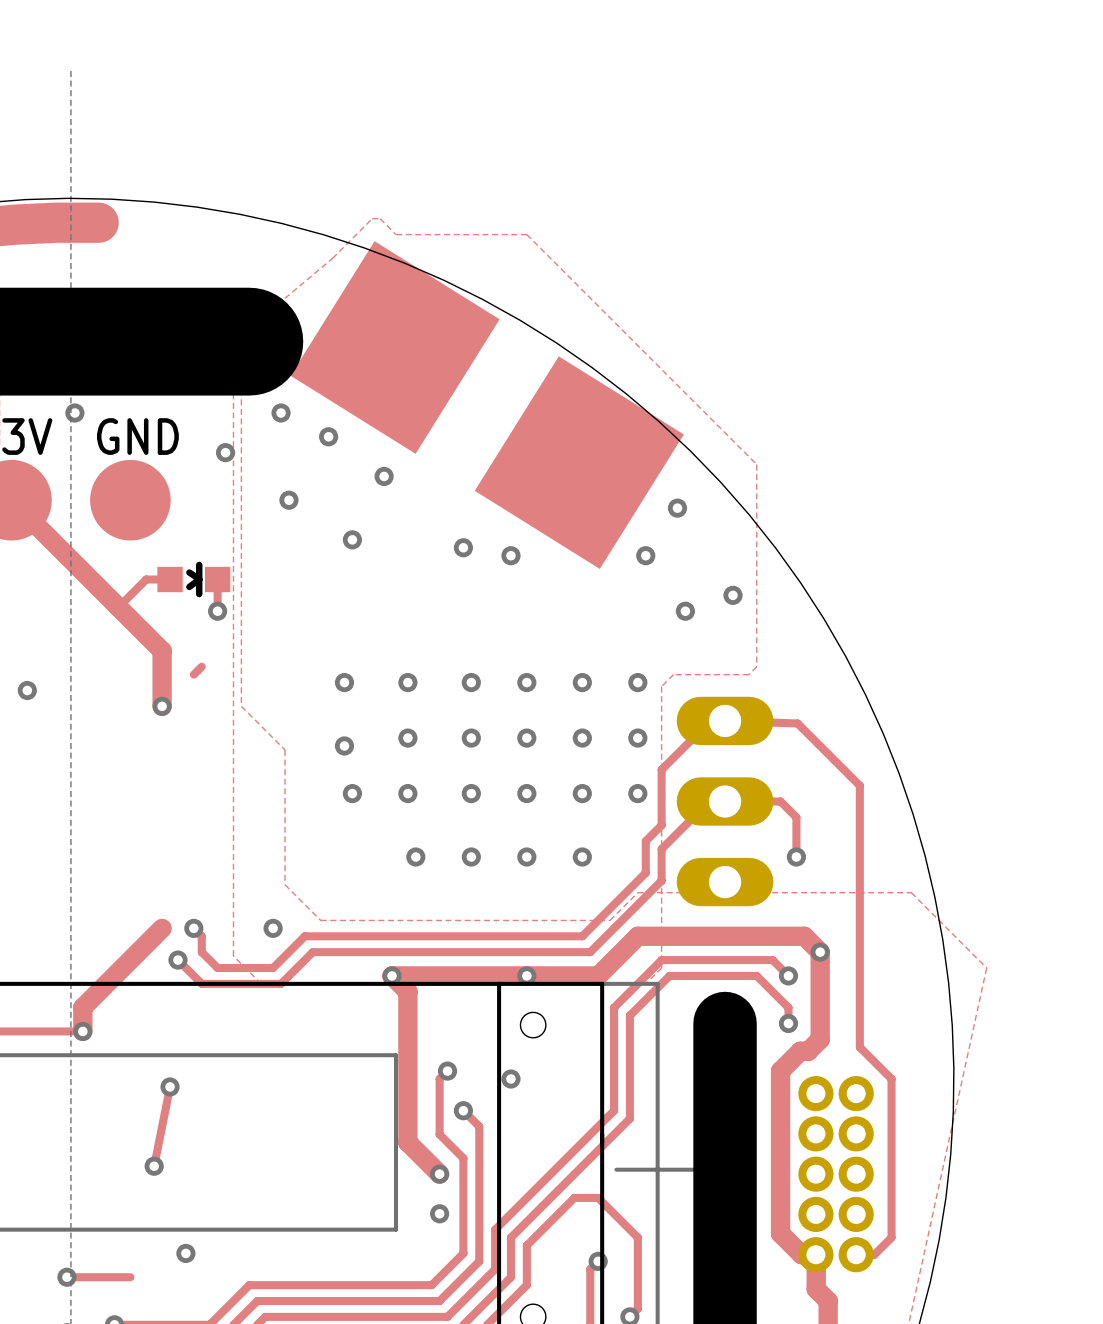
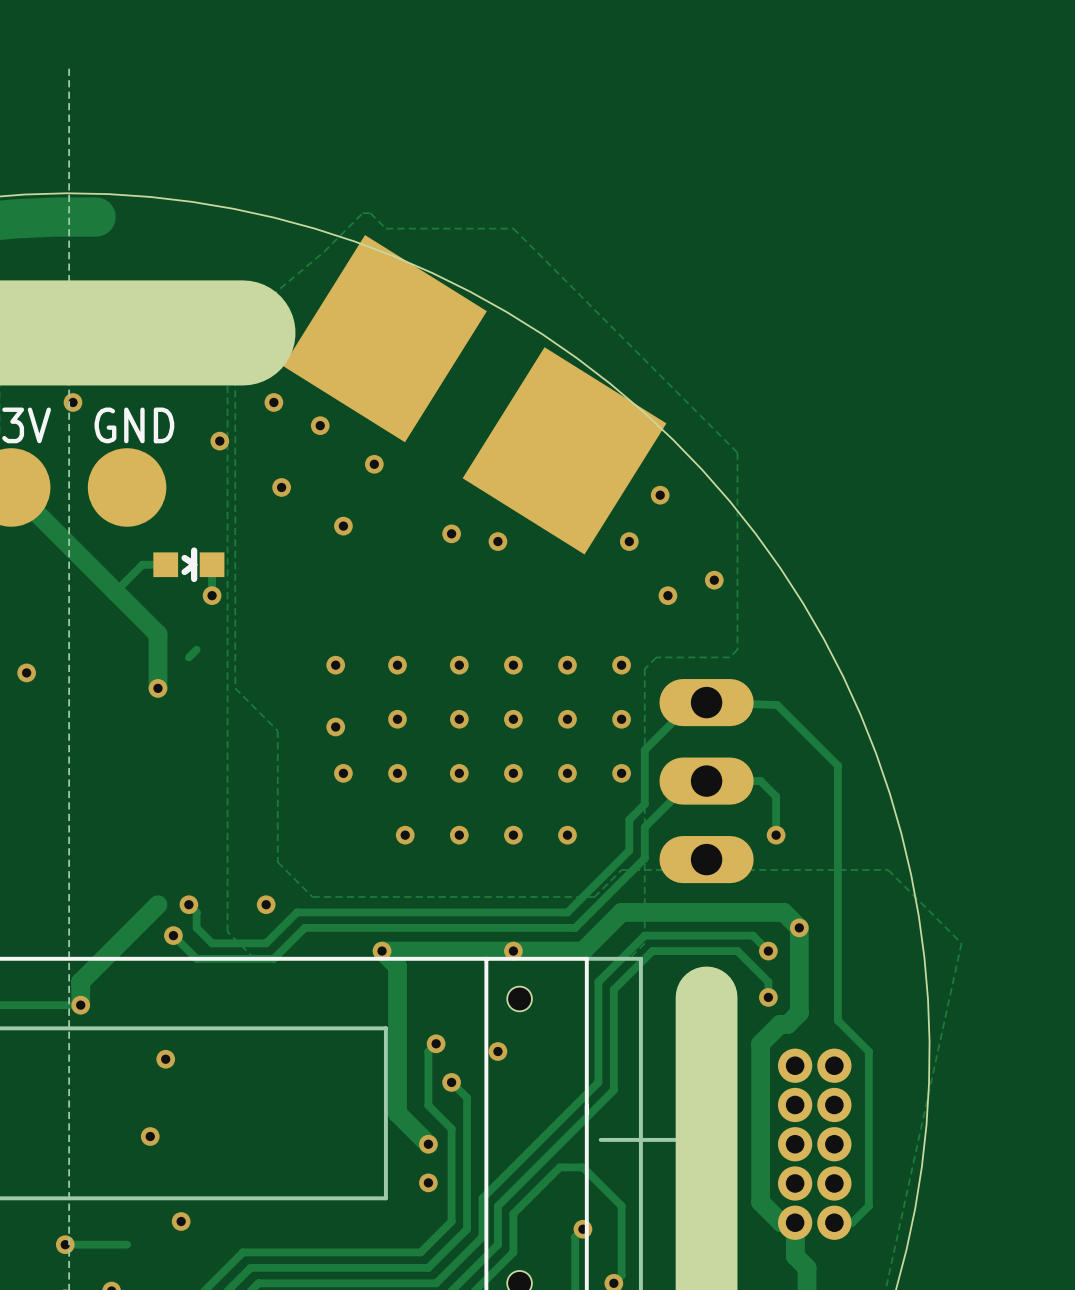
track: (170, 1086) (154, 1166) -> none

